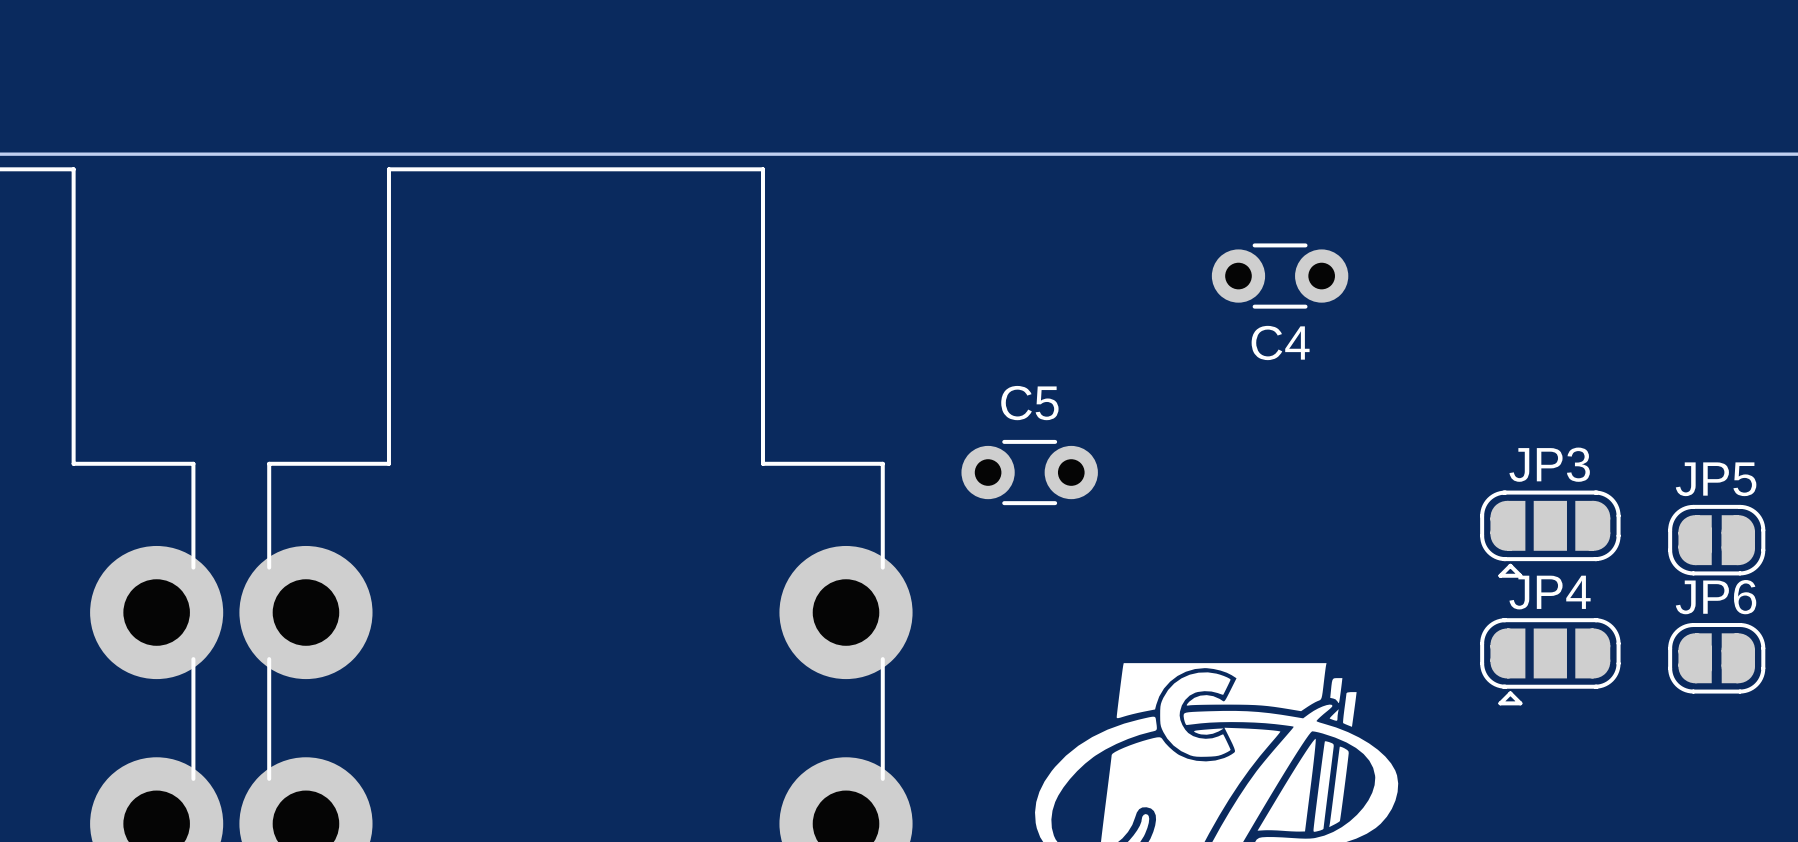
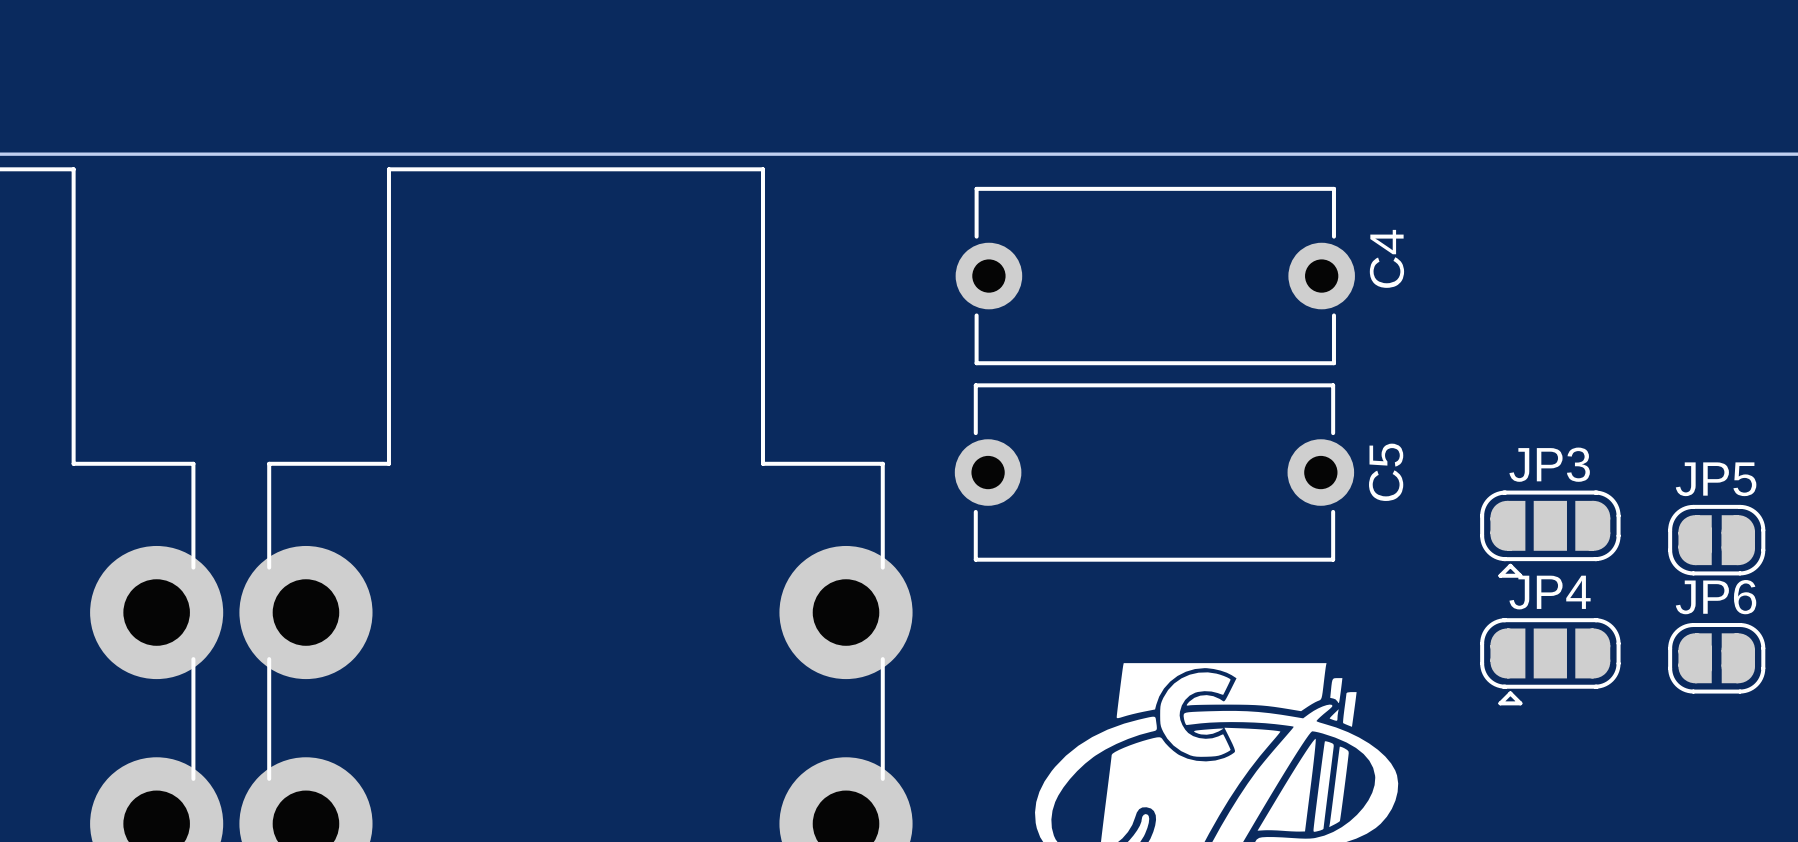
C4 footprint: [1211, 243, 1349, 309] -> [955, 186, 1355, 366]
C4 name position: C4 (1280, 342) -> C4 (1386, 258)
C5 name position: C5 (1029, 403) -> C5 (1386, 472)
C5 footprint: [961, 439, 1098, 506] -> [954, 383, 1355, 562]

